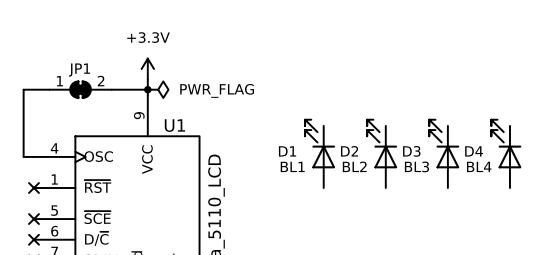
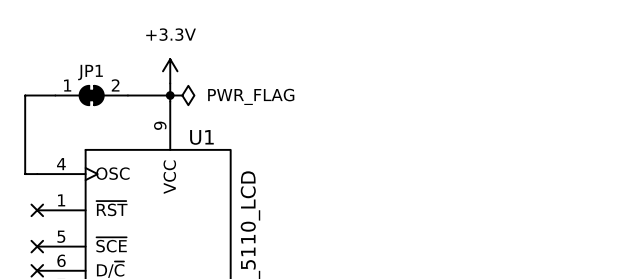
D1: BL1 (320, 153) -> none
D2: BL2 (382, 153) -> none
D3: BL3 (444, 153) -> none
D4: BL4 (506, 153) -> none

